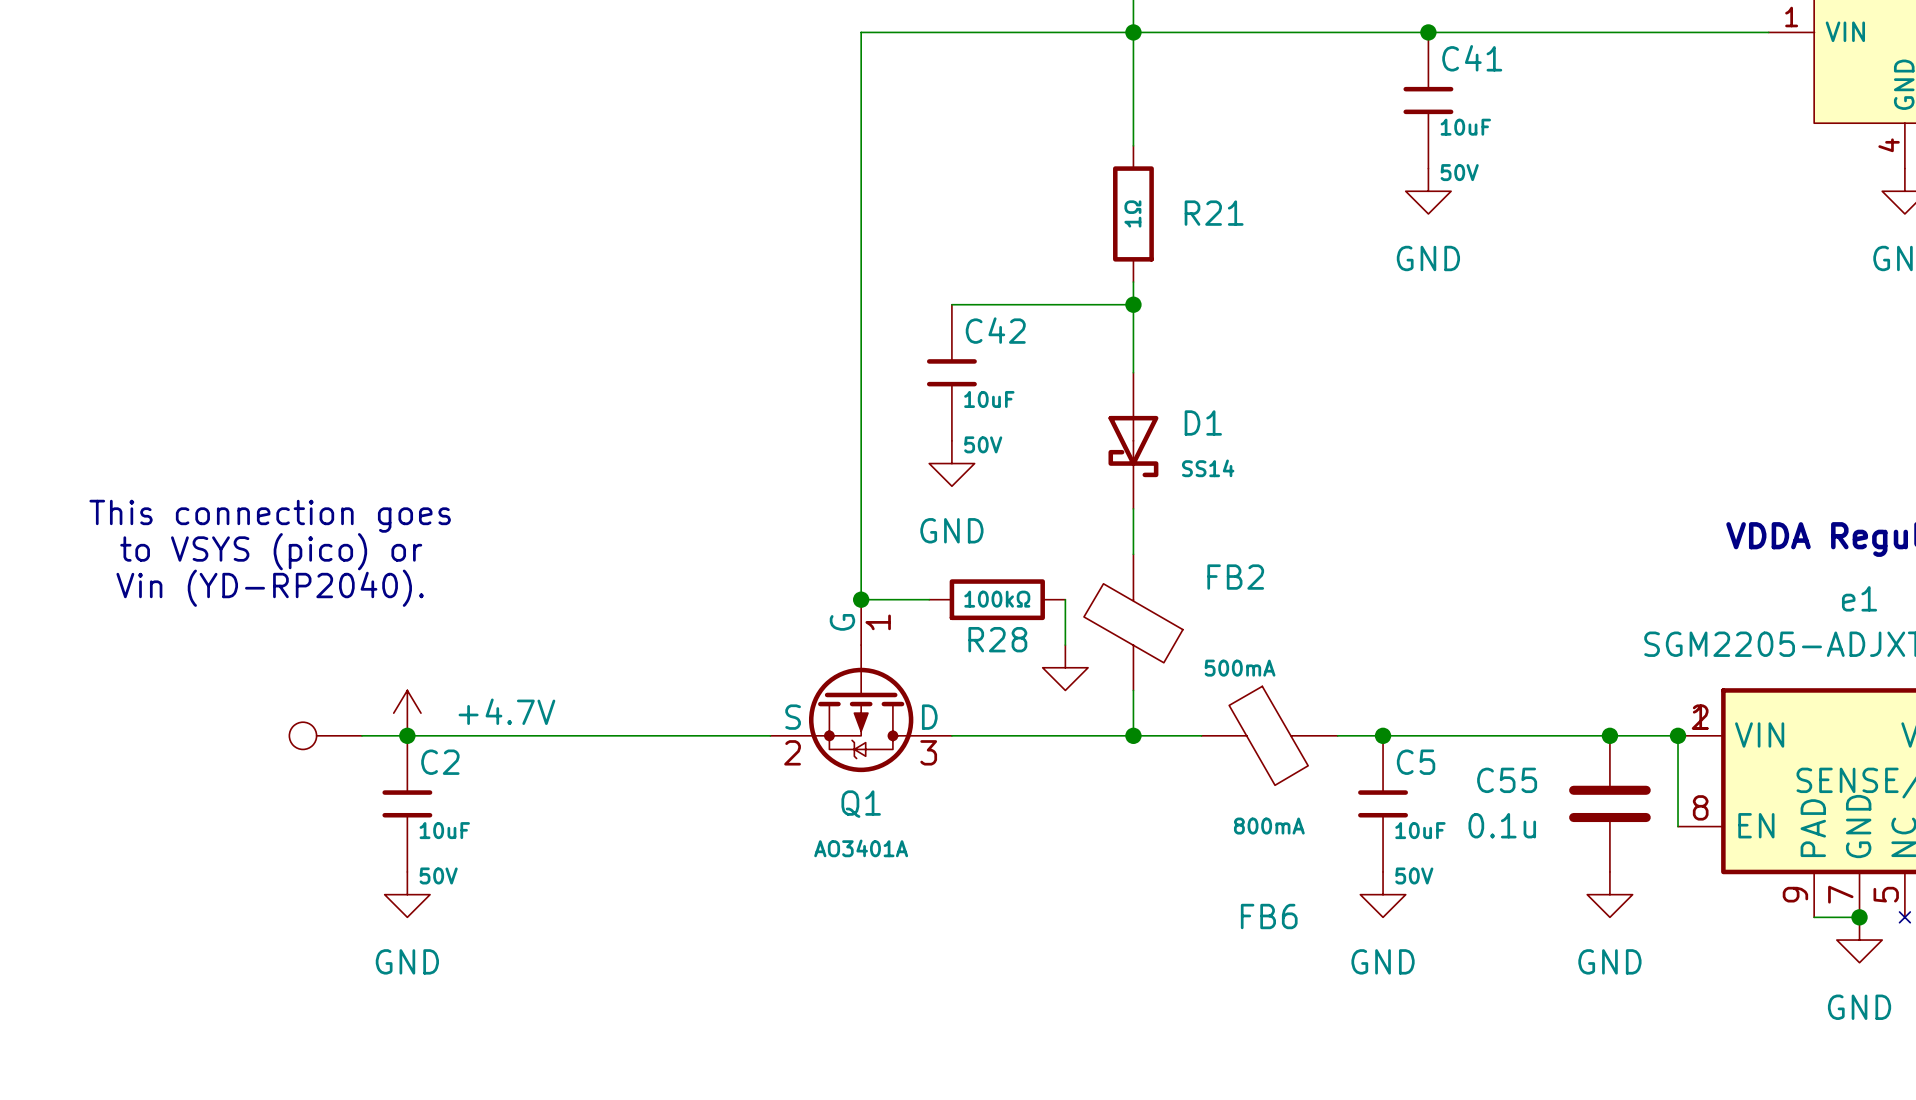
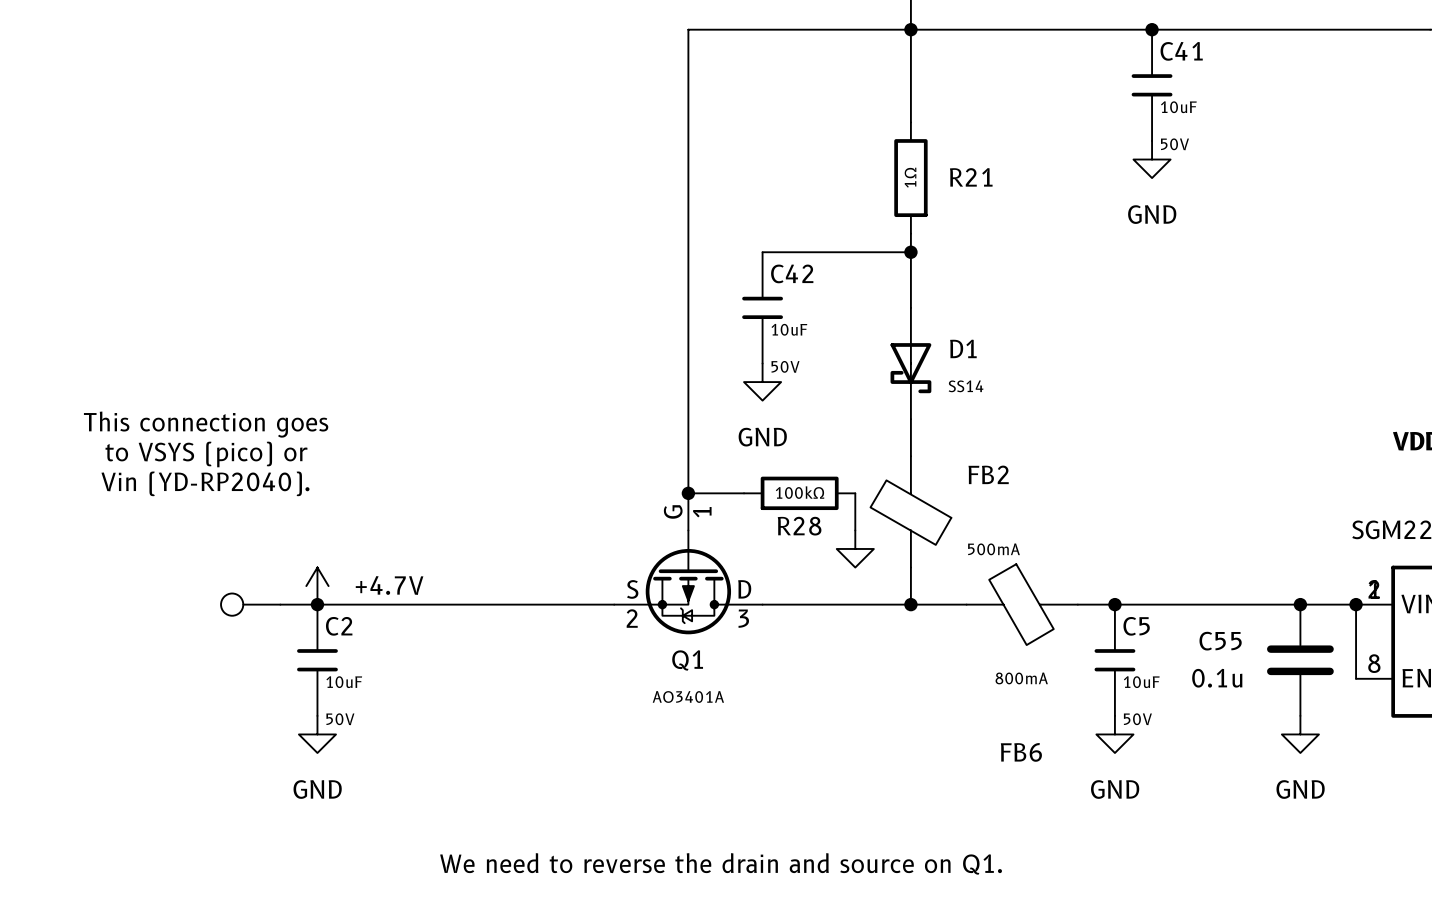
text: none -> We need to reverse the drain and source on Q1. (721, 863)

